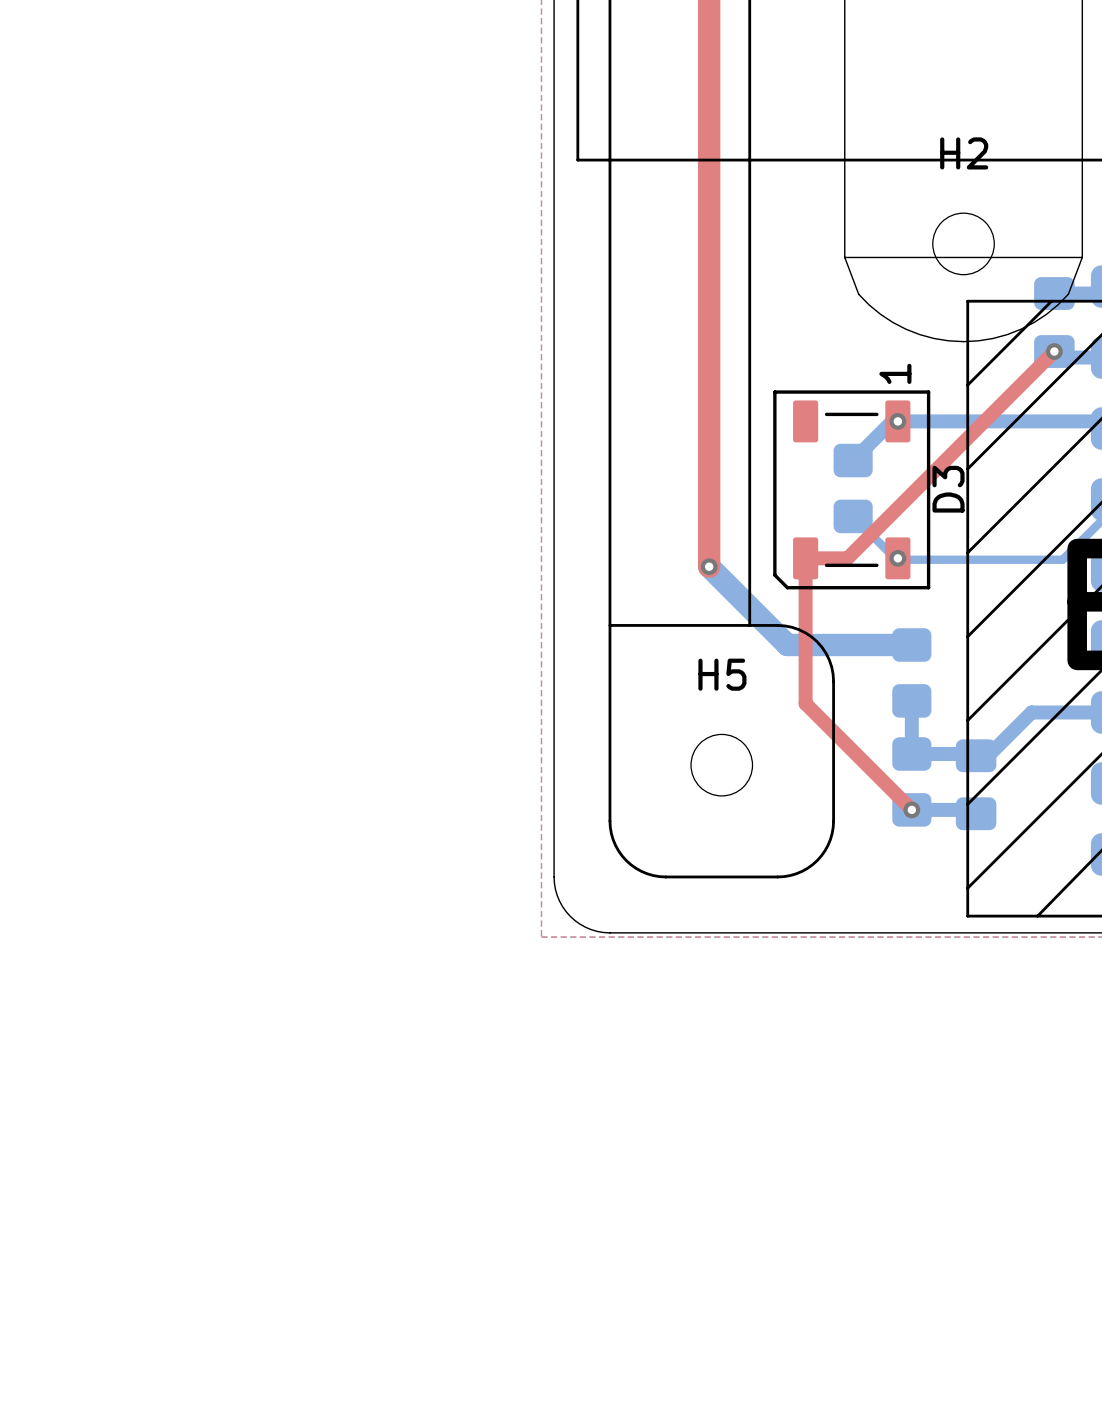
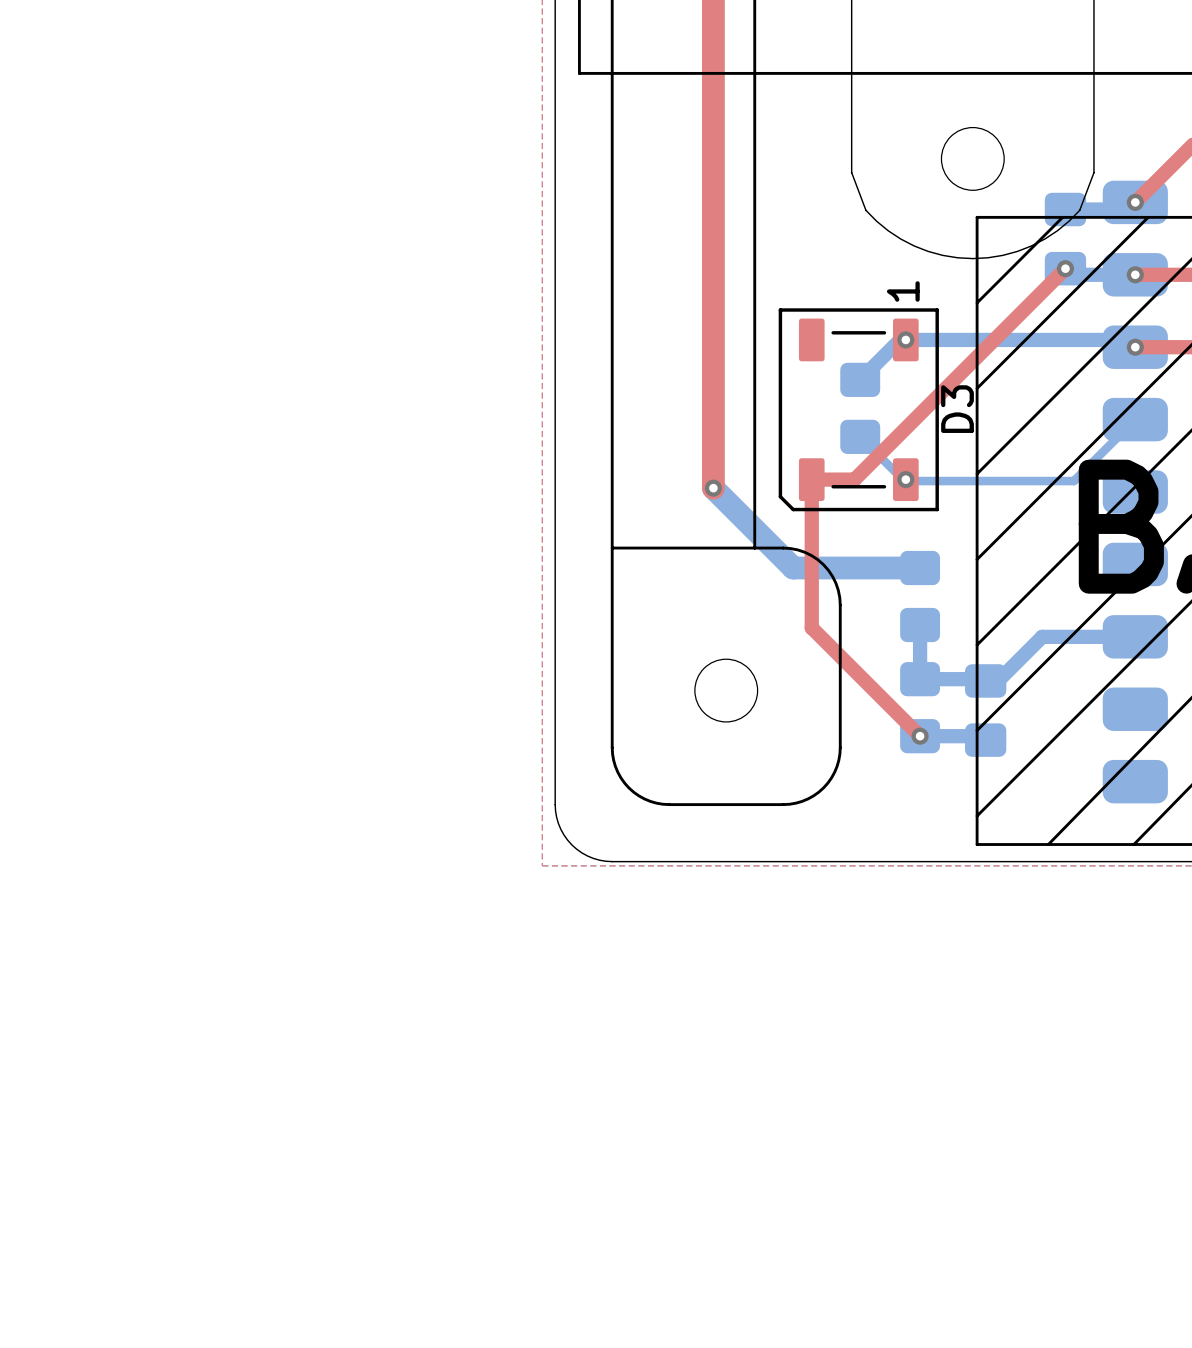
H2 name: H2 (964, 153) -> none
line: (844, 257) (1082, 257) -> none
H5 name: H5 (722, 674) -> none

